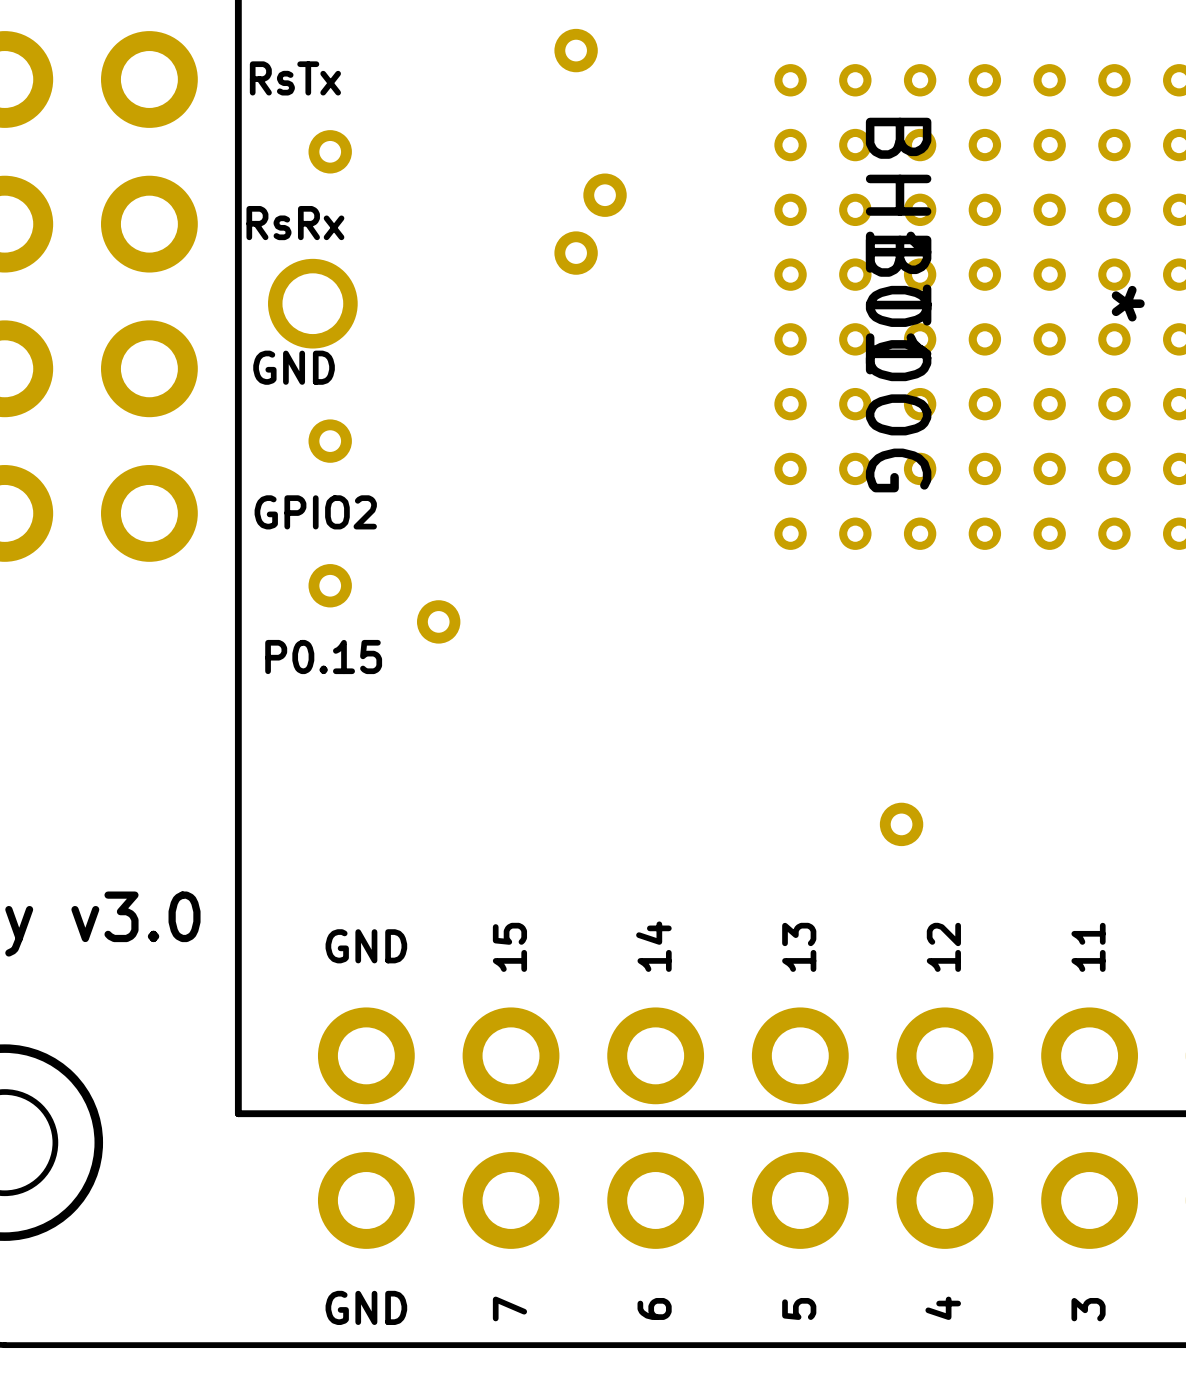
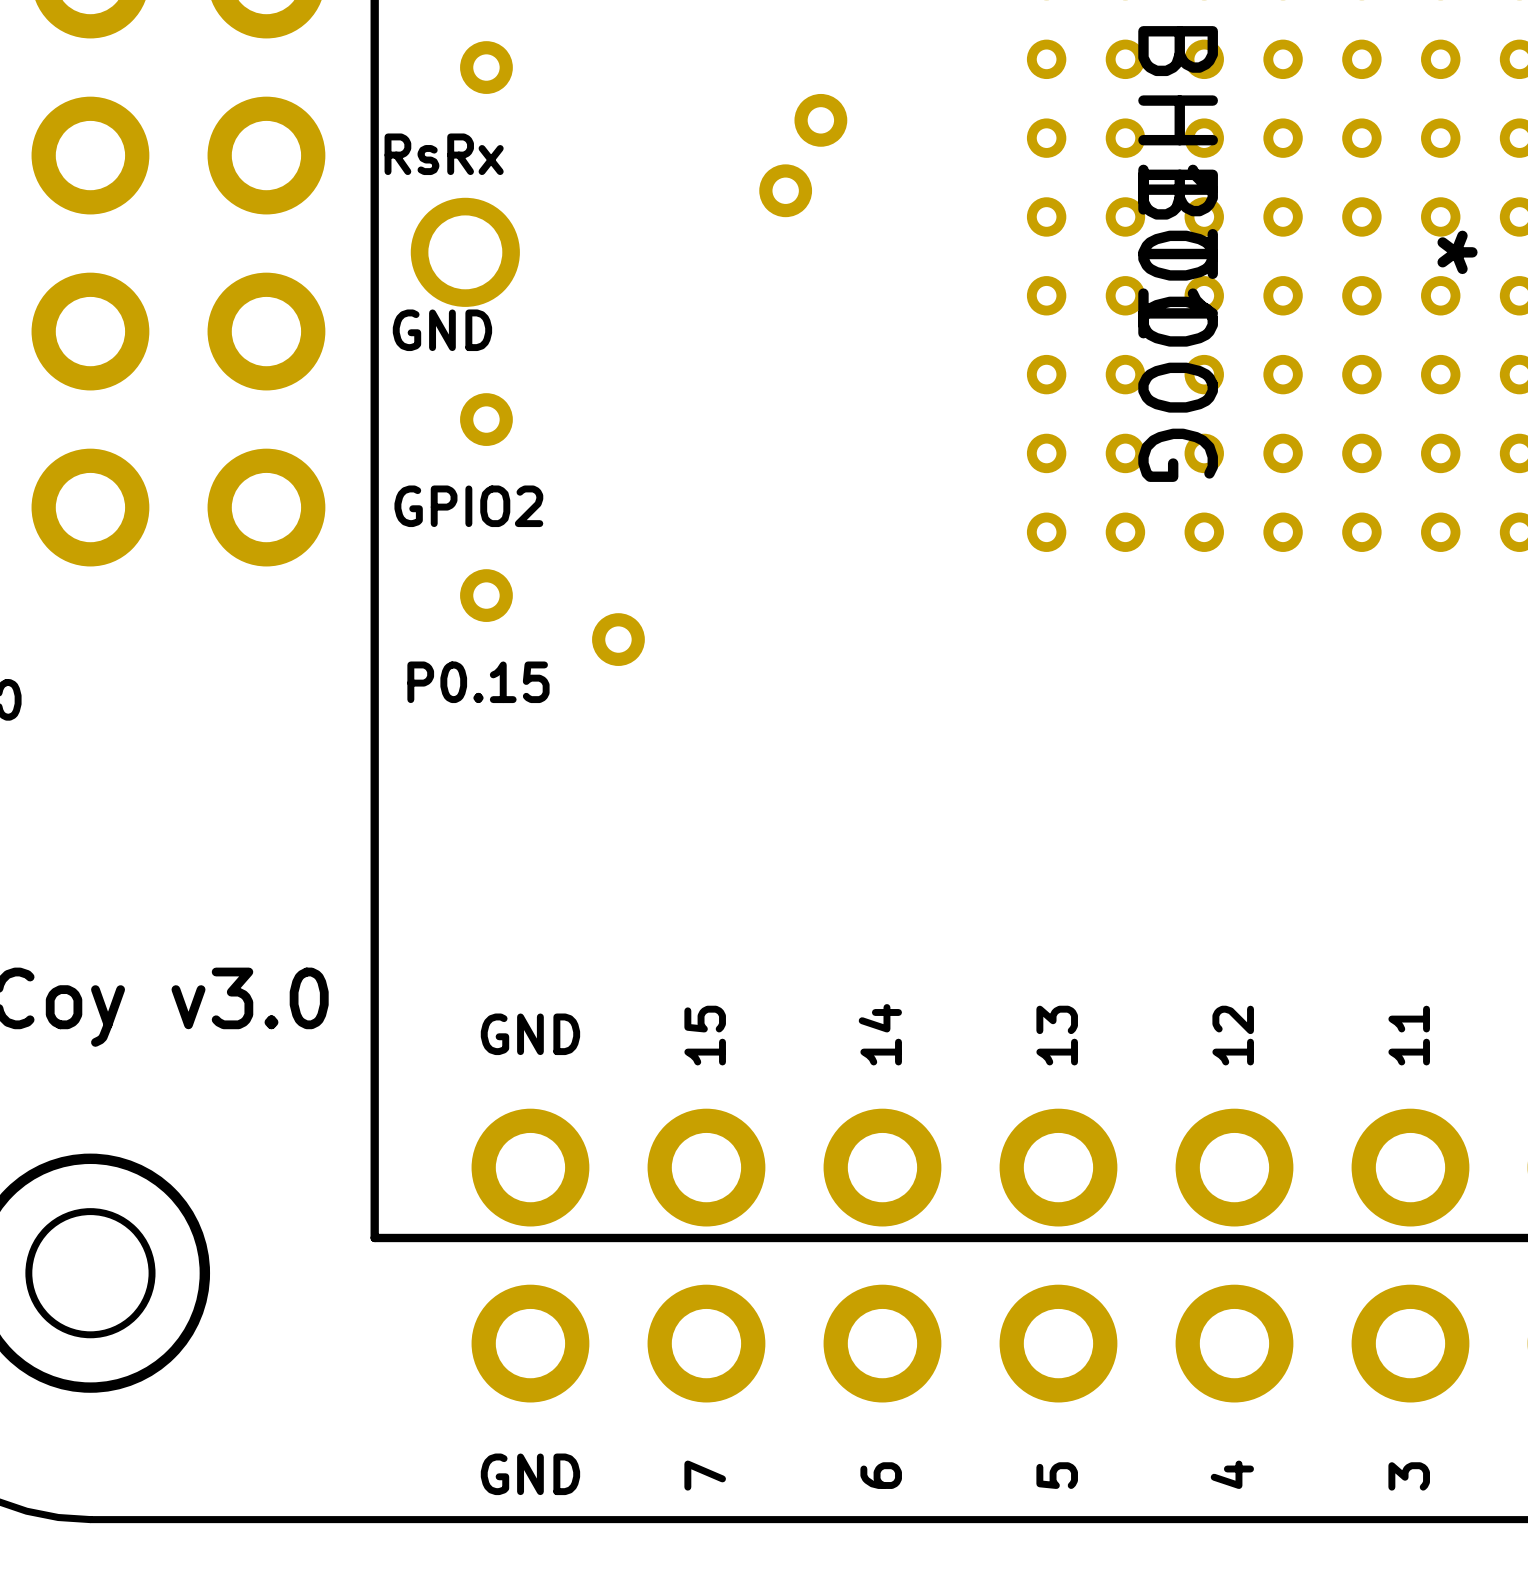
part: (901, 824) -> none

